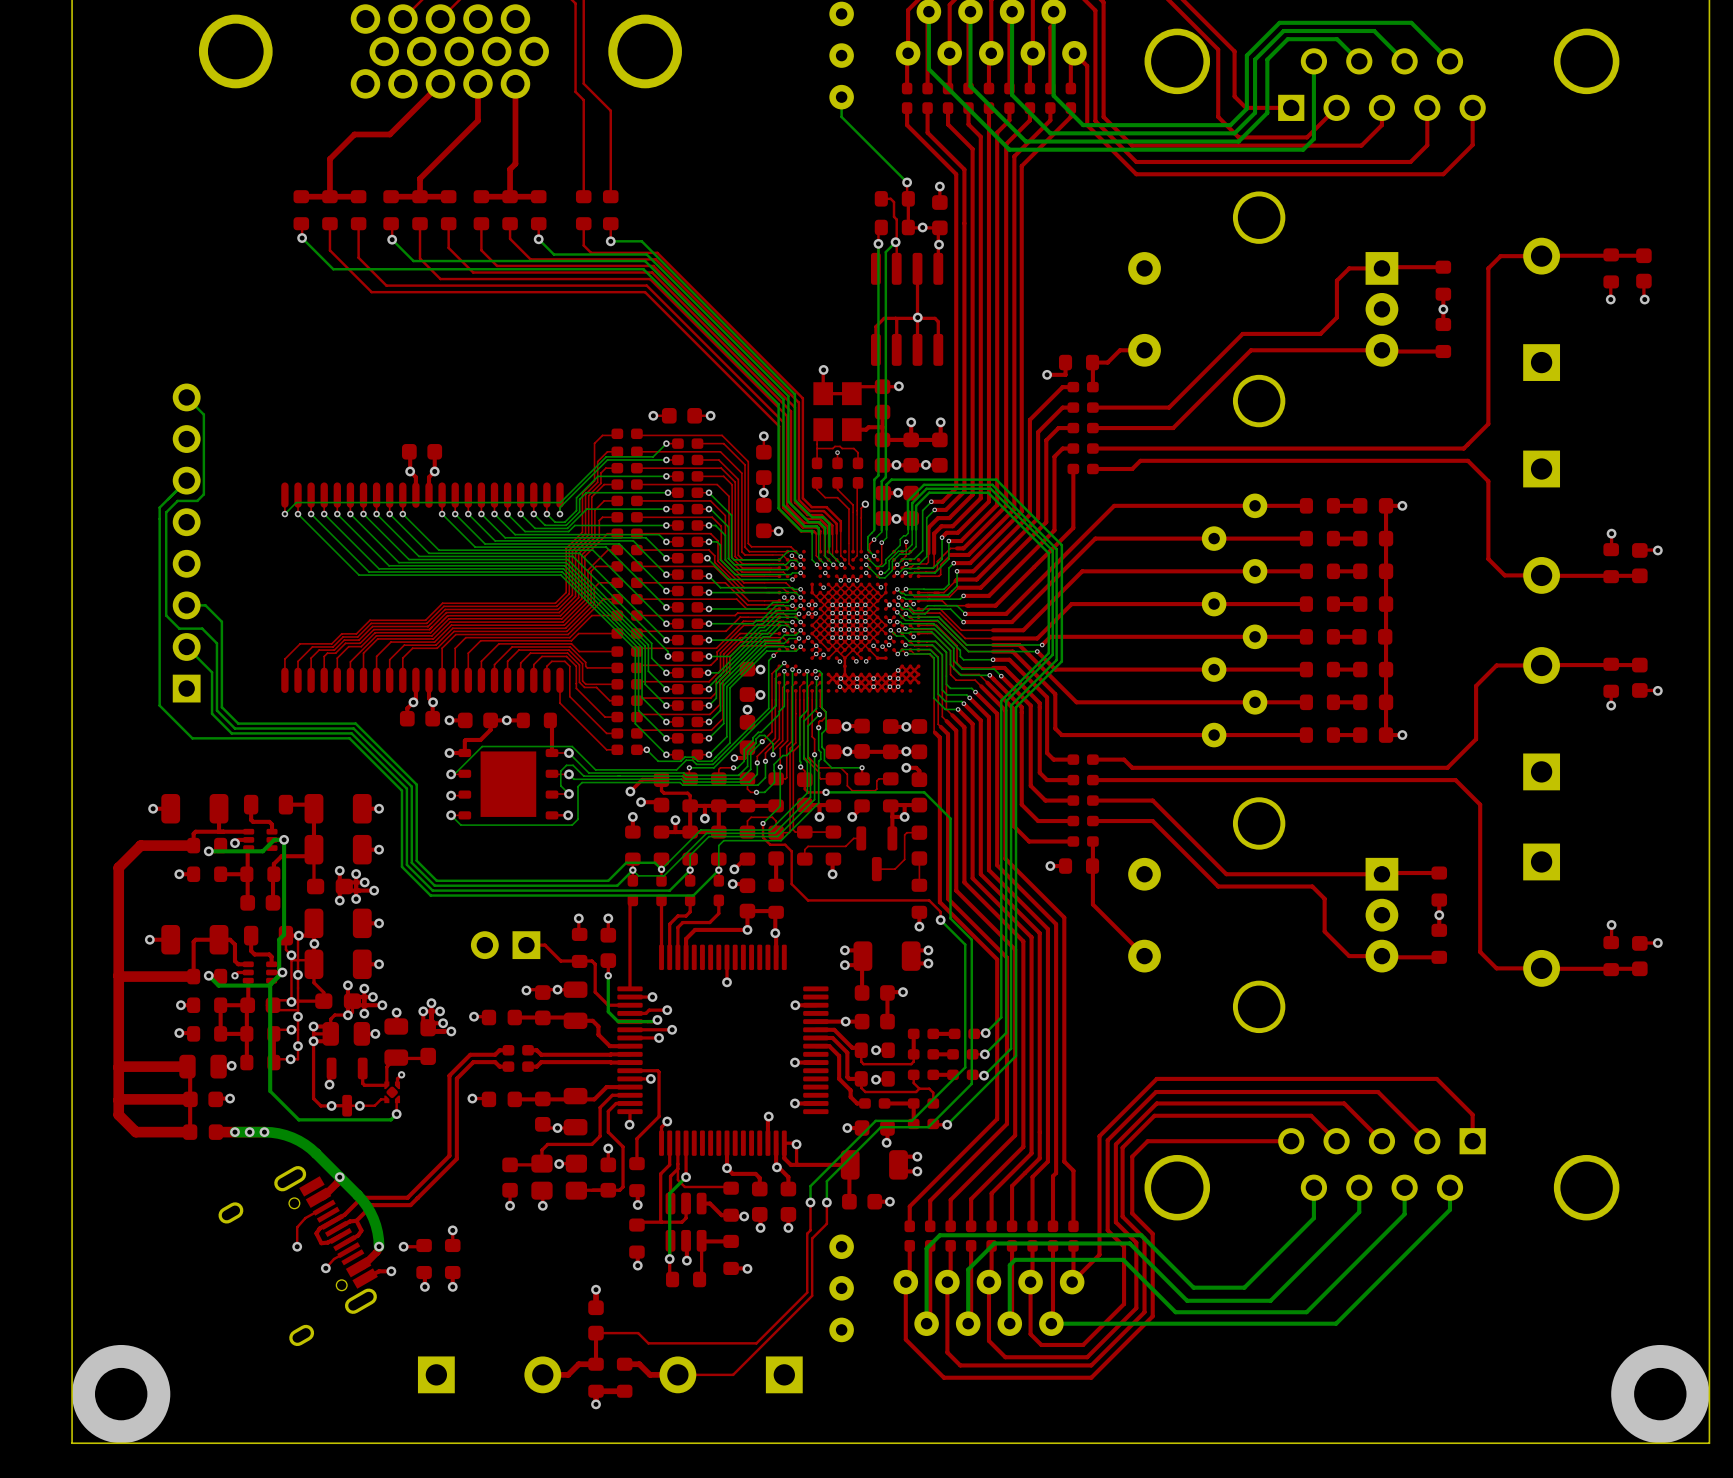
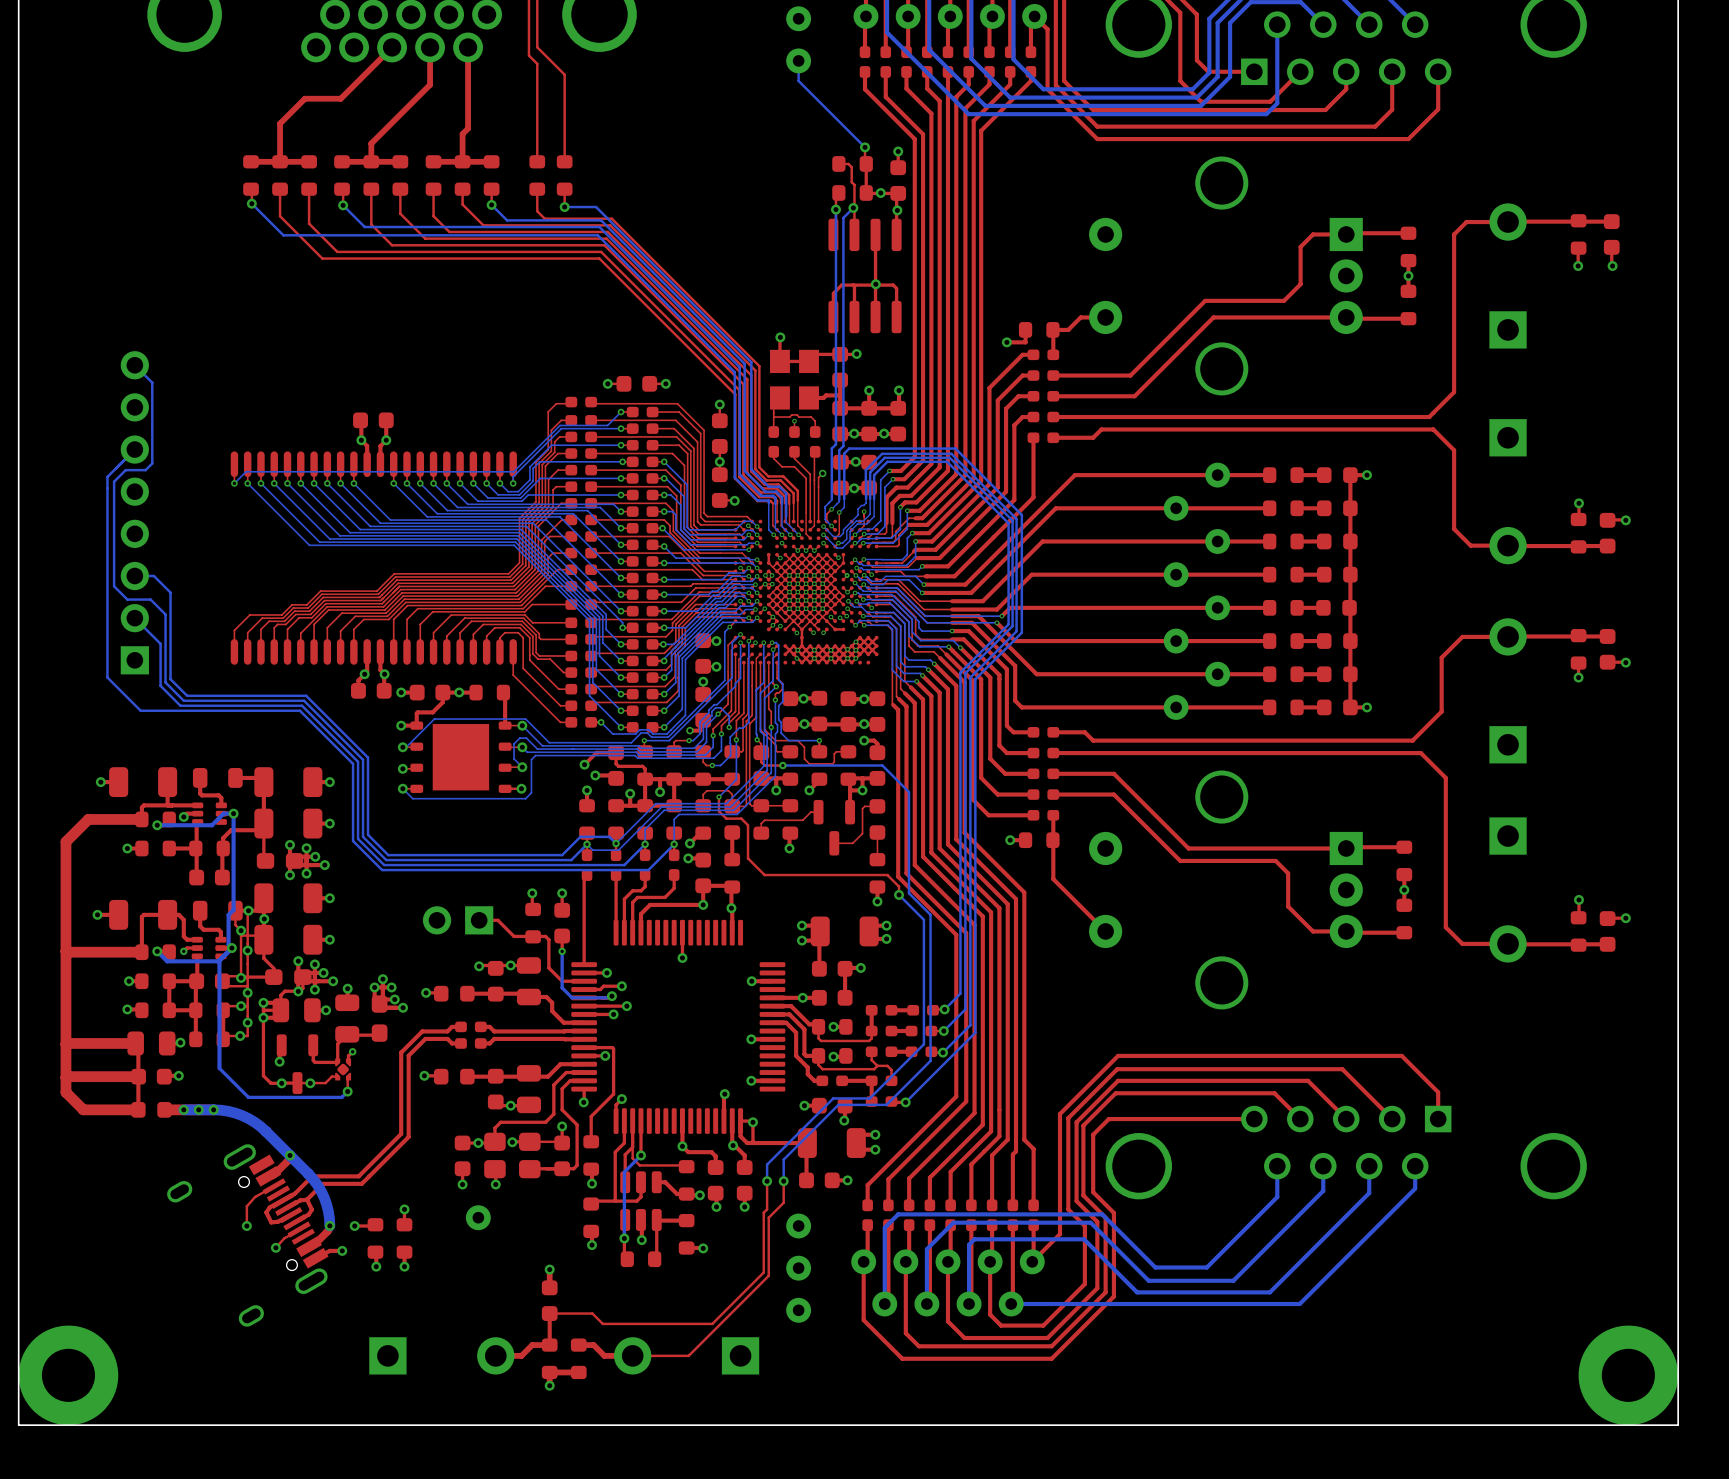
top track: none -> (529, 1141) (562, 1143)
via: none -> (478, 1143)
part: none -> (478, 1217)

